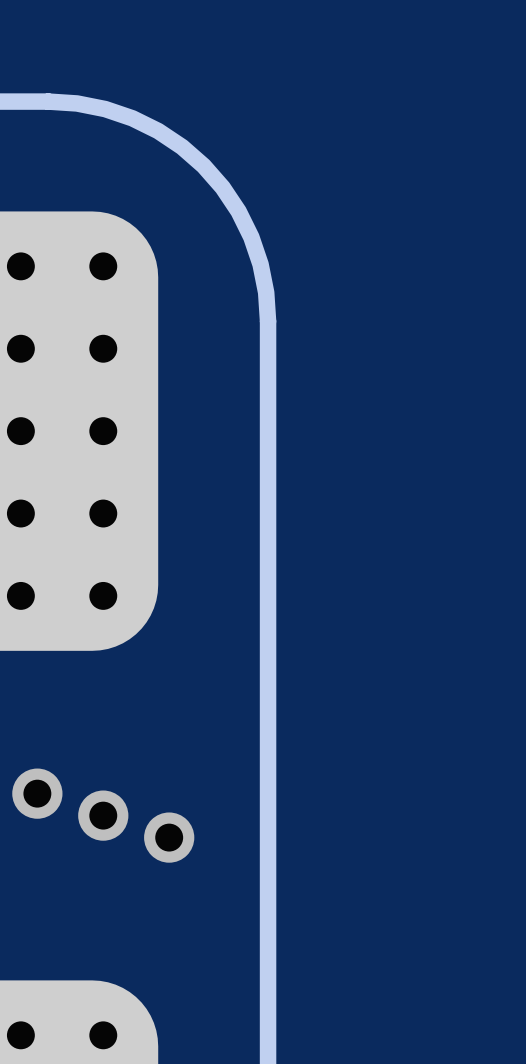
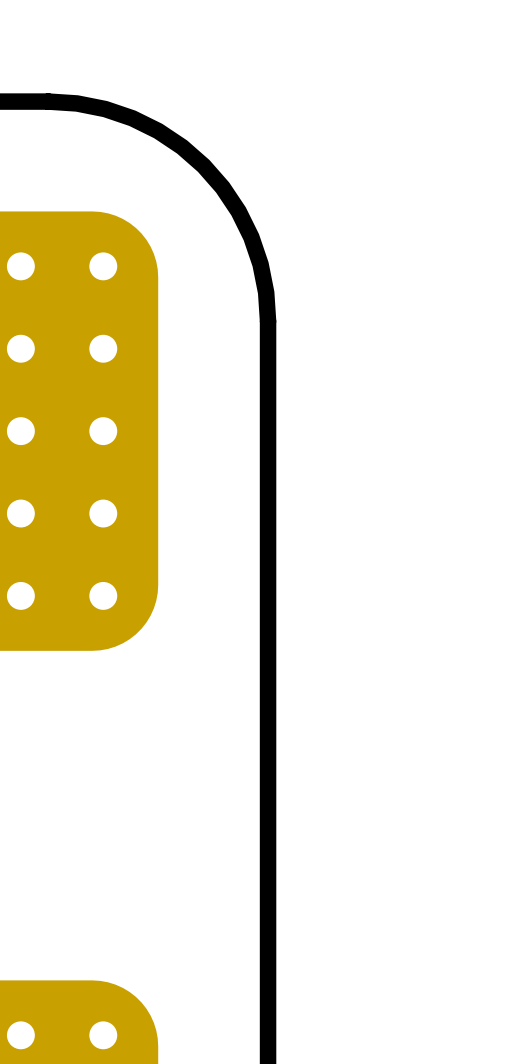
via: (37, 793) -> none
via: (103, 815) -> none
via: (169, 837) -> none

